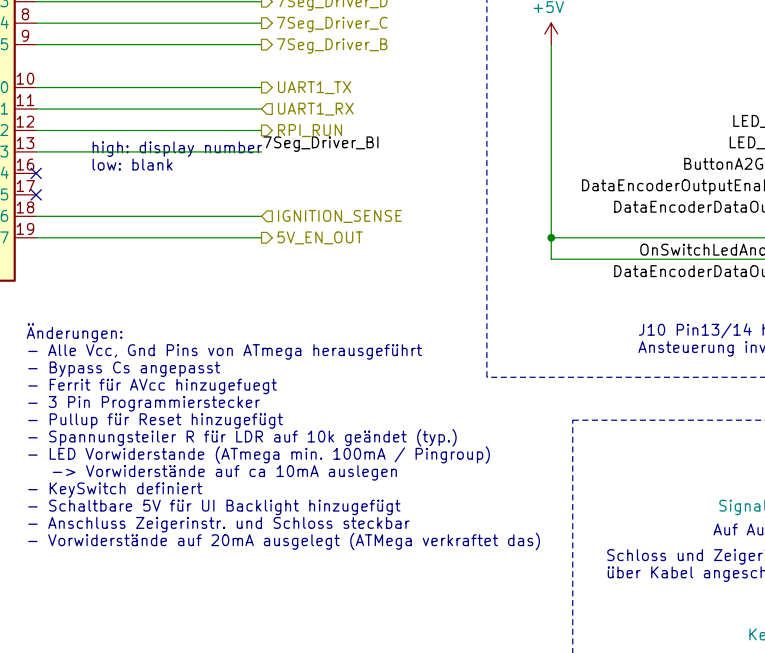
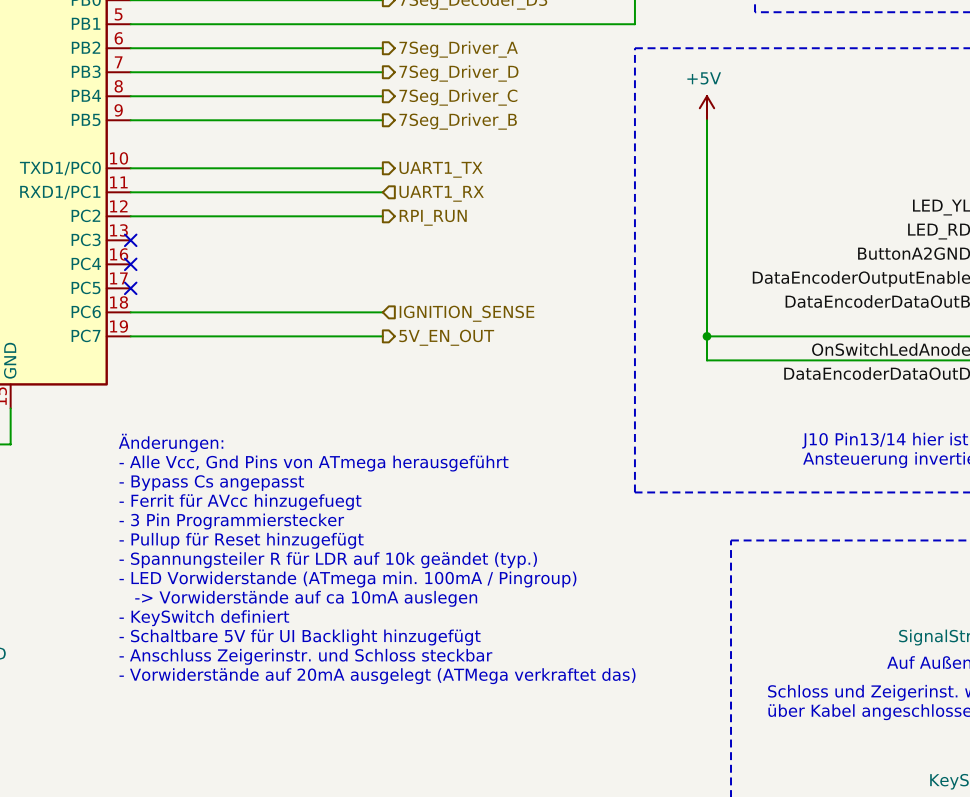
label: 7Seg_Driver_BI (320, 144) -> none
text: high: display number (177, 149) -> none
wire: (36, 151) (261, 151) -> none
no-connect mark: none -> (130, 240)
text: low: blank (132, 164) -> none

